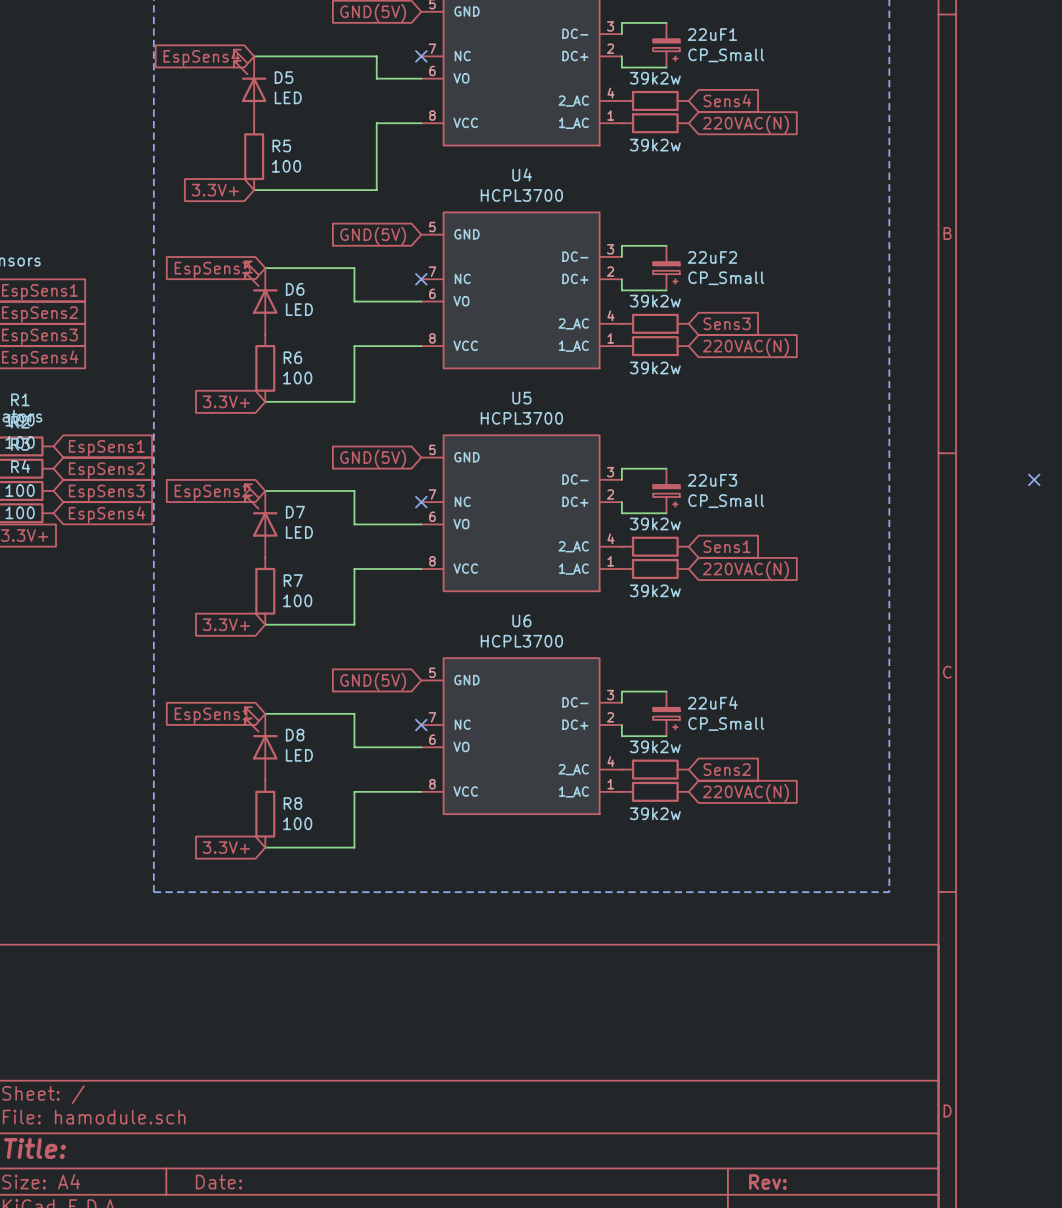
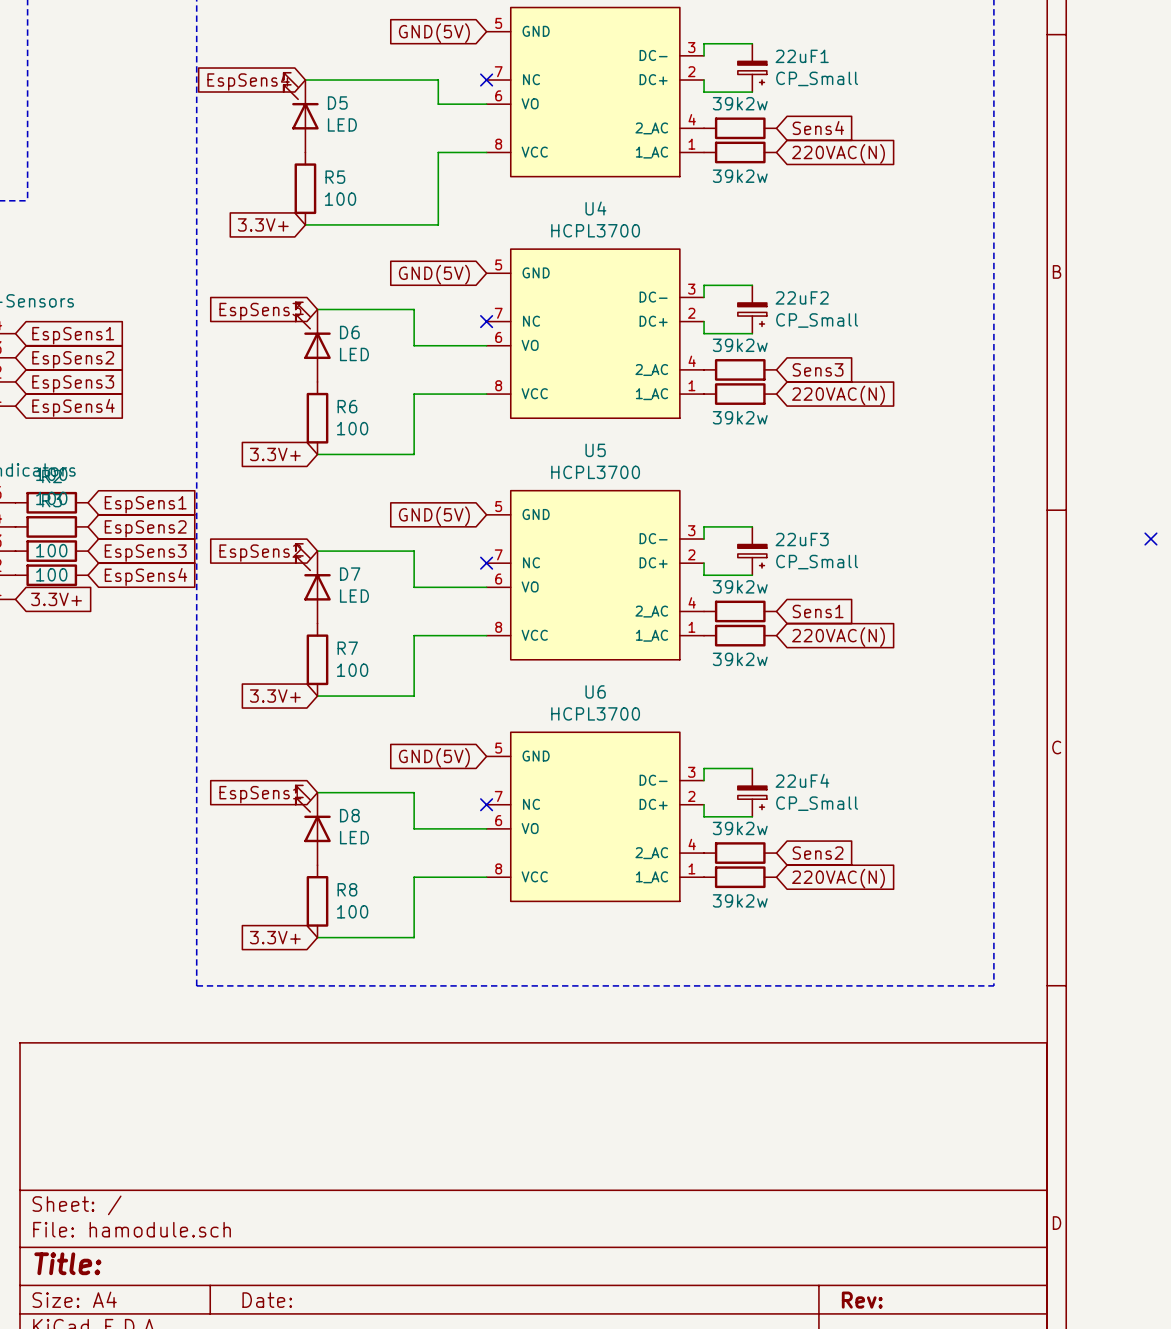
R1 name: R1 (20, 399) -> none
R4 name: R4 (20, 466) -> none

